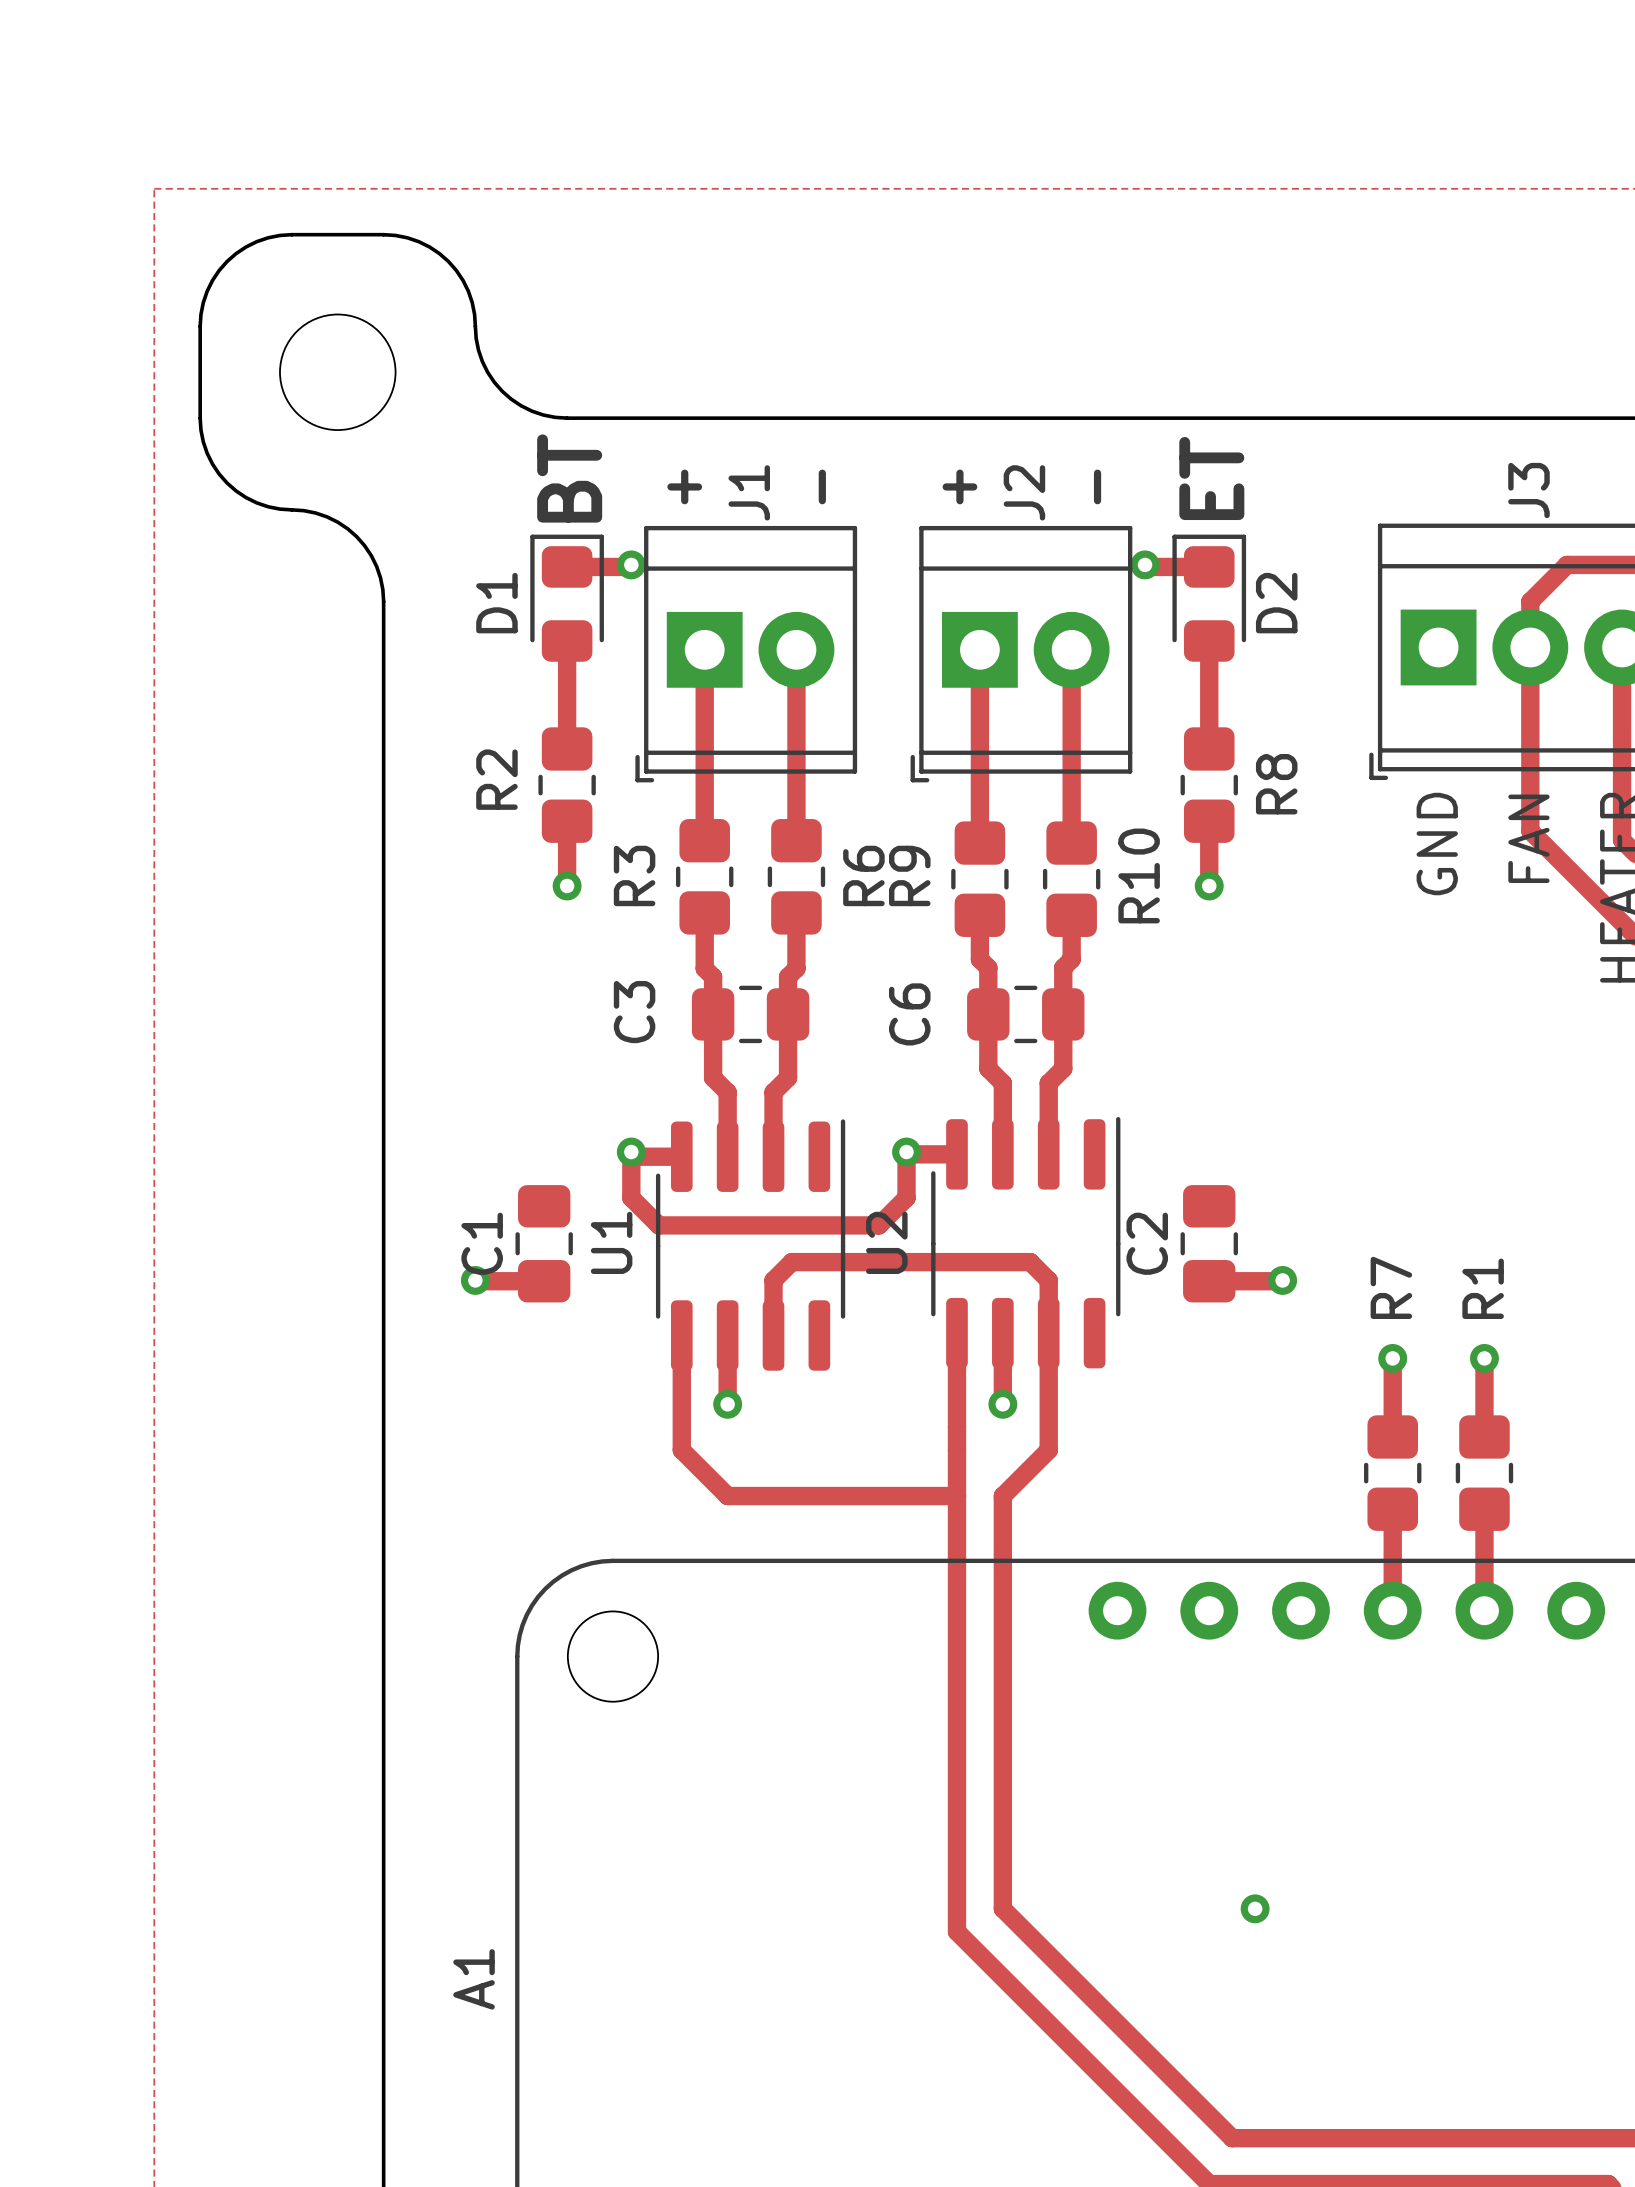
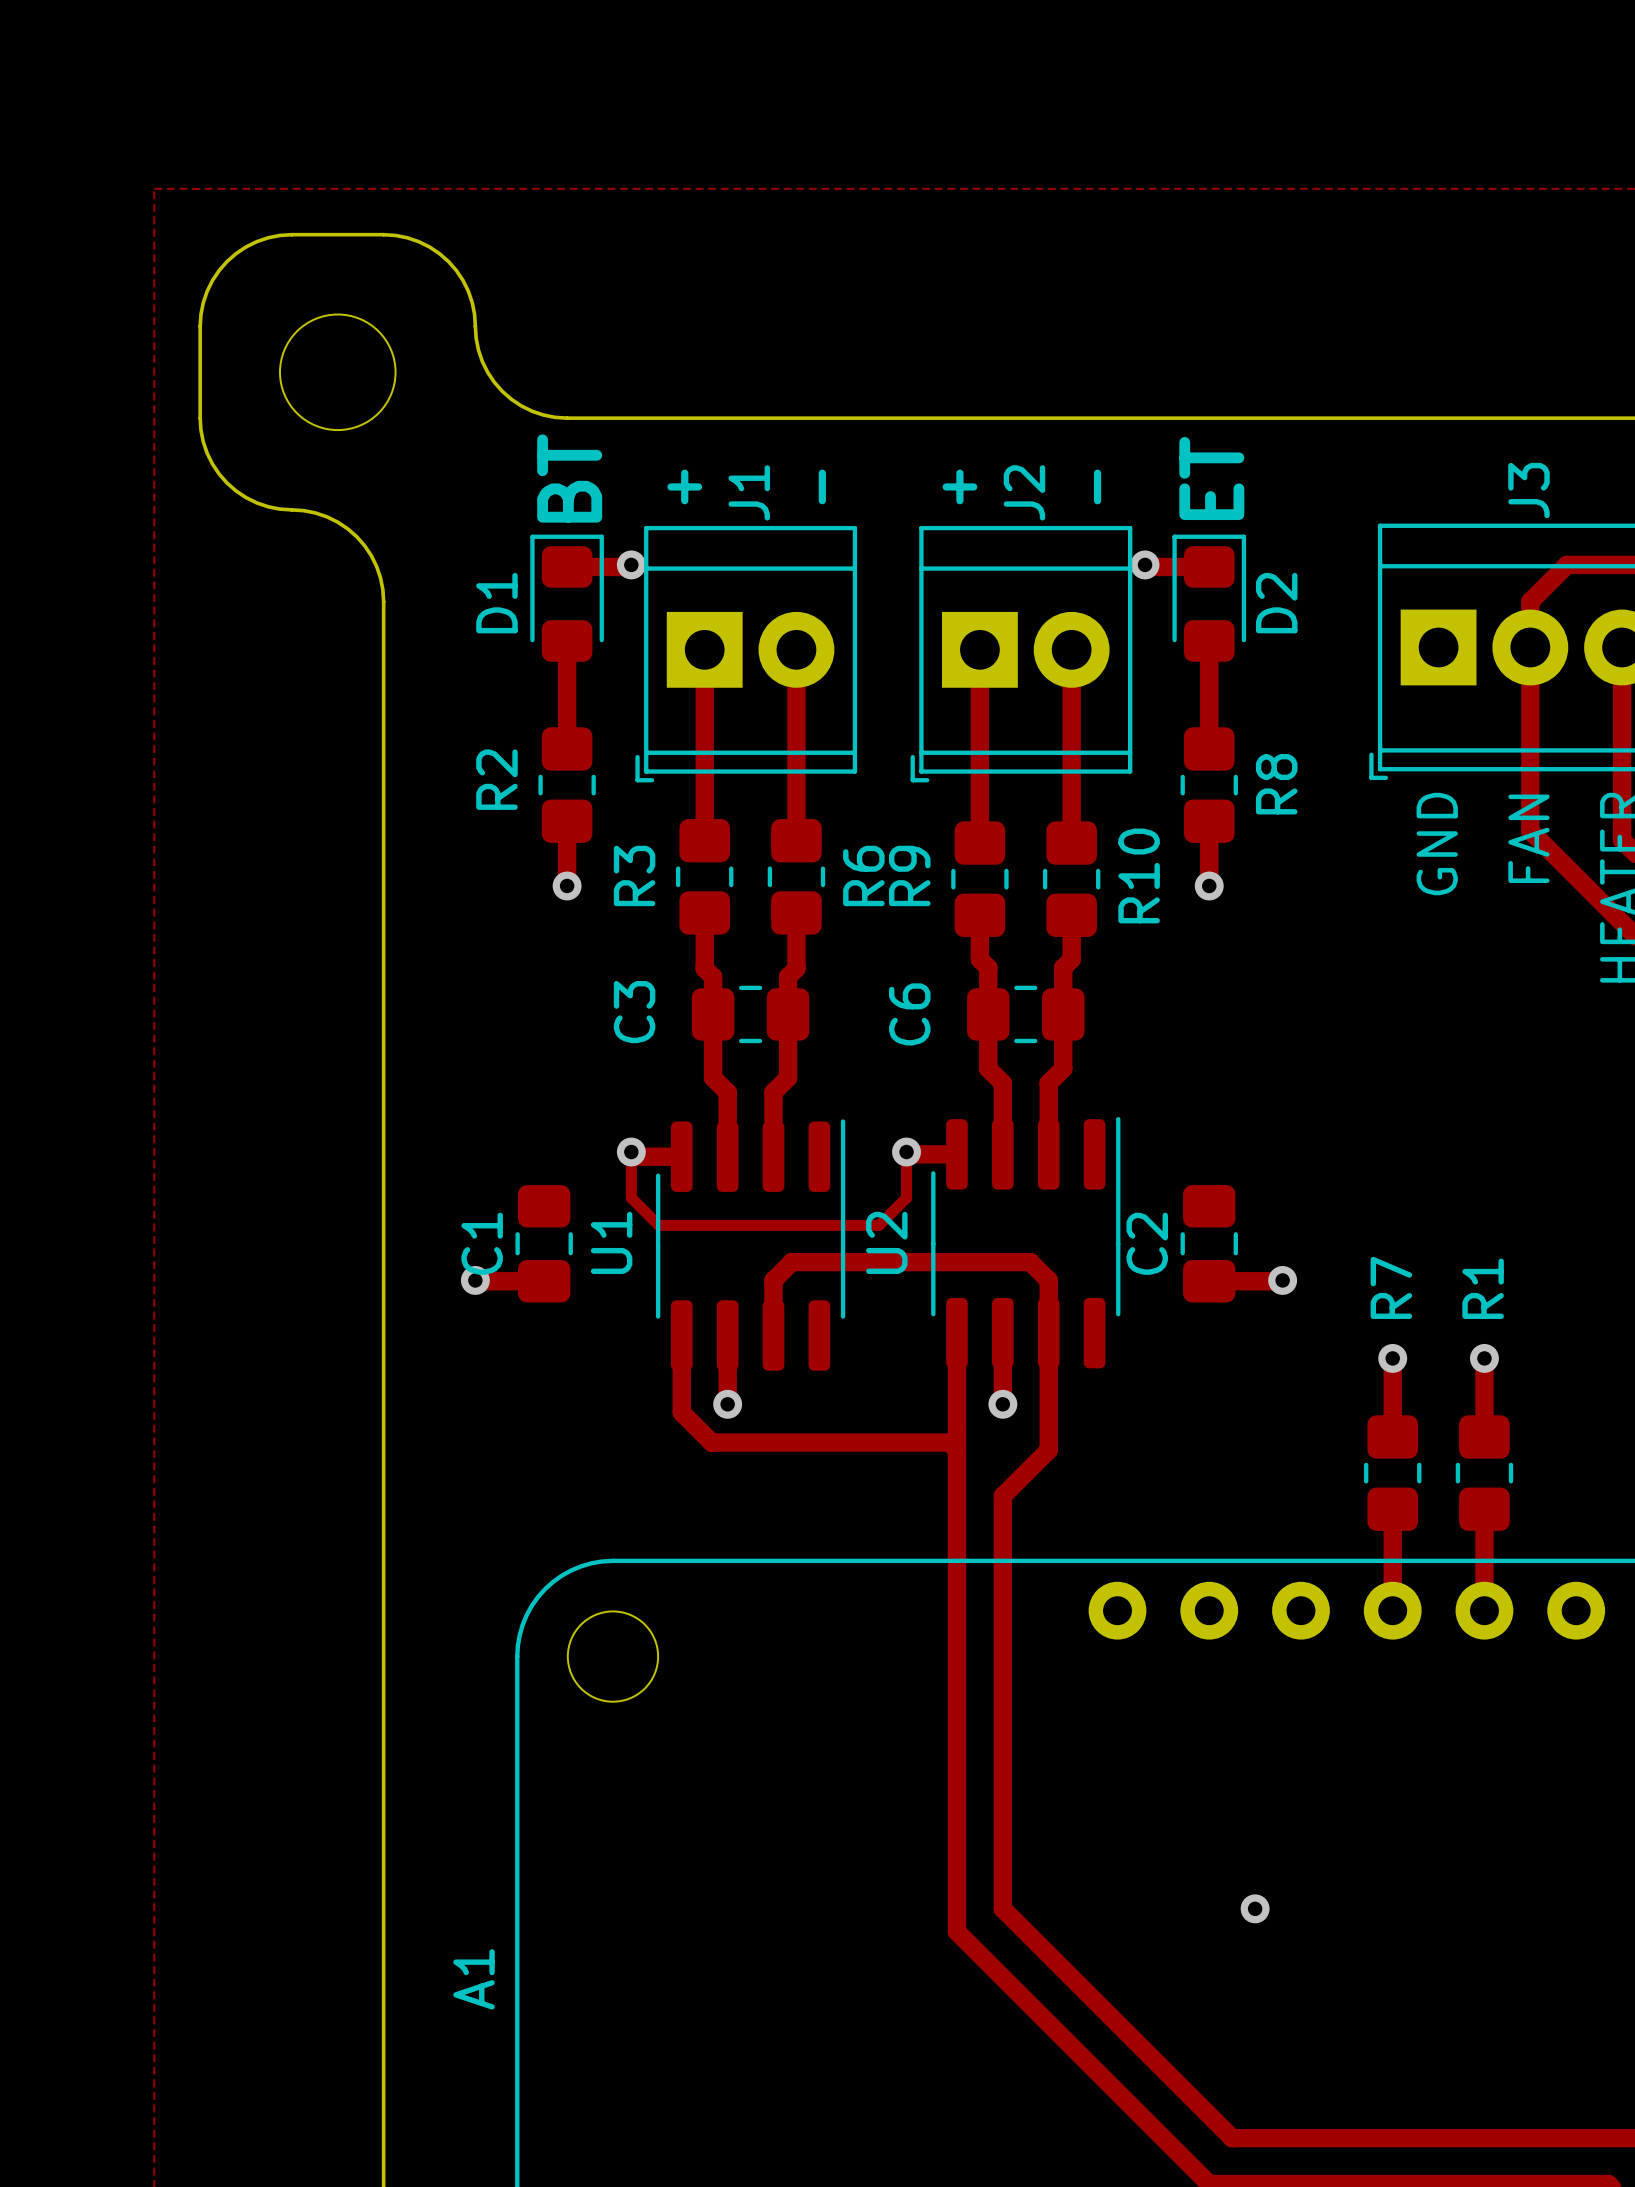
track width: thick (631, 1152) (631, 1197) (658, 1225) (879, 1225) (906, 1197) (906, 1152) -> thin (631, 1152) (631, 1197) (658, 1225) (879, 1225) (906, 1197) (906, 1152)
track: (681, 1412) (681, 1450) (727, 1496) (956, 1496) -> (681, 1412) (711, 1442) (949, 1442) (956, 1450)

